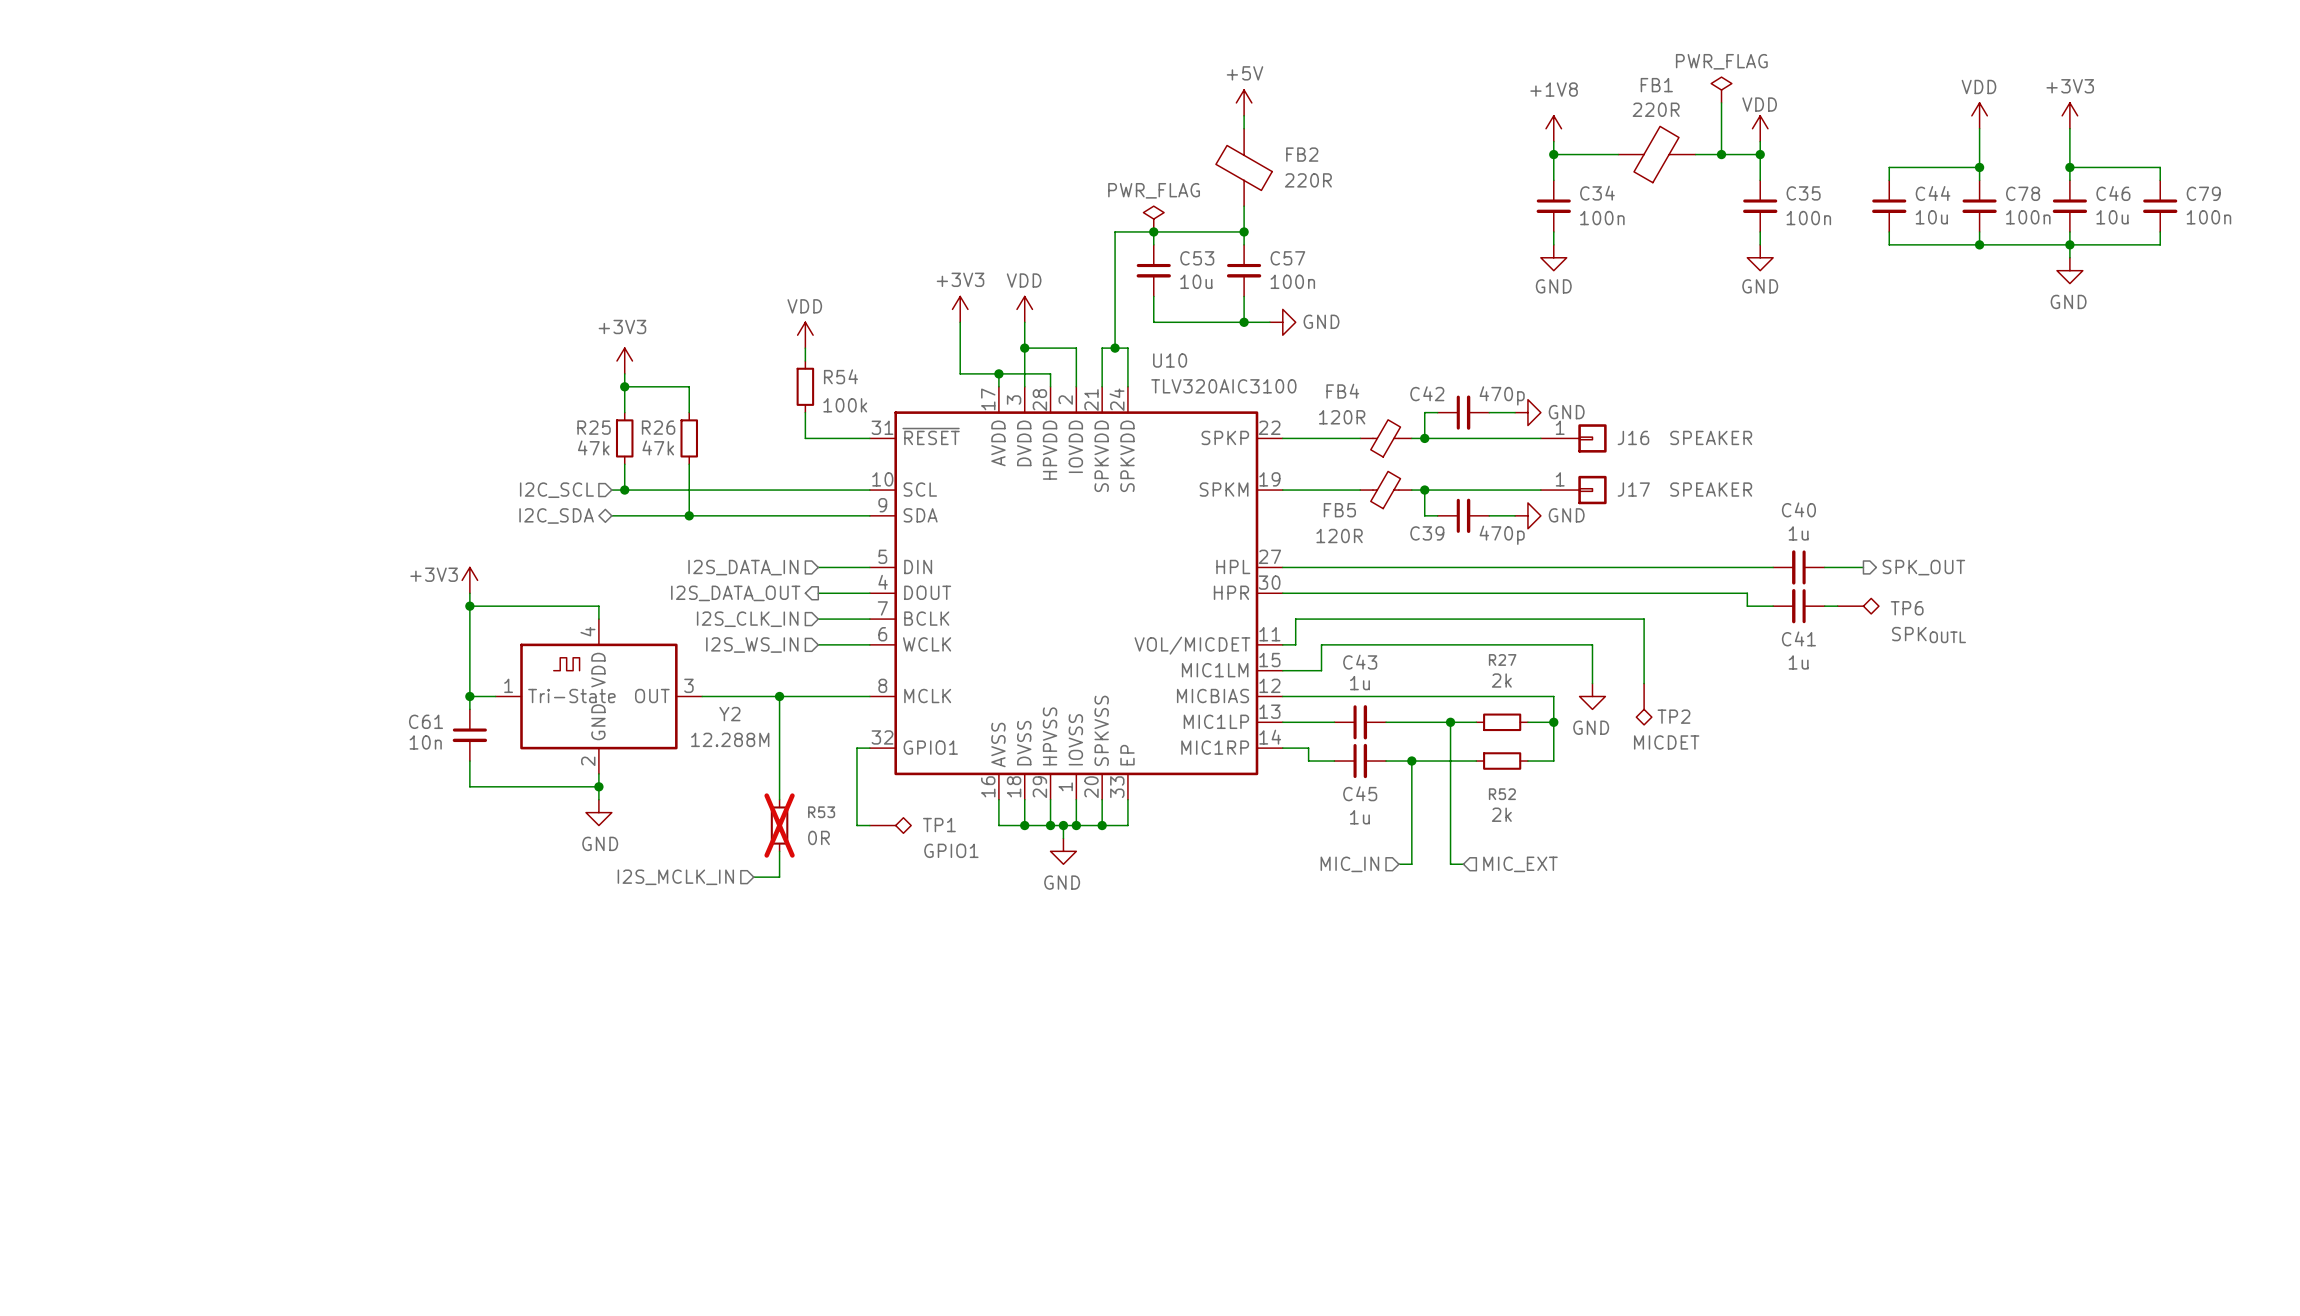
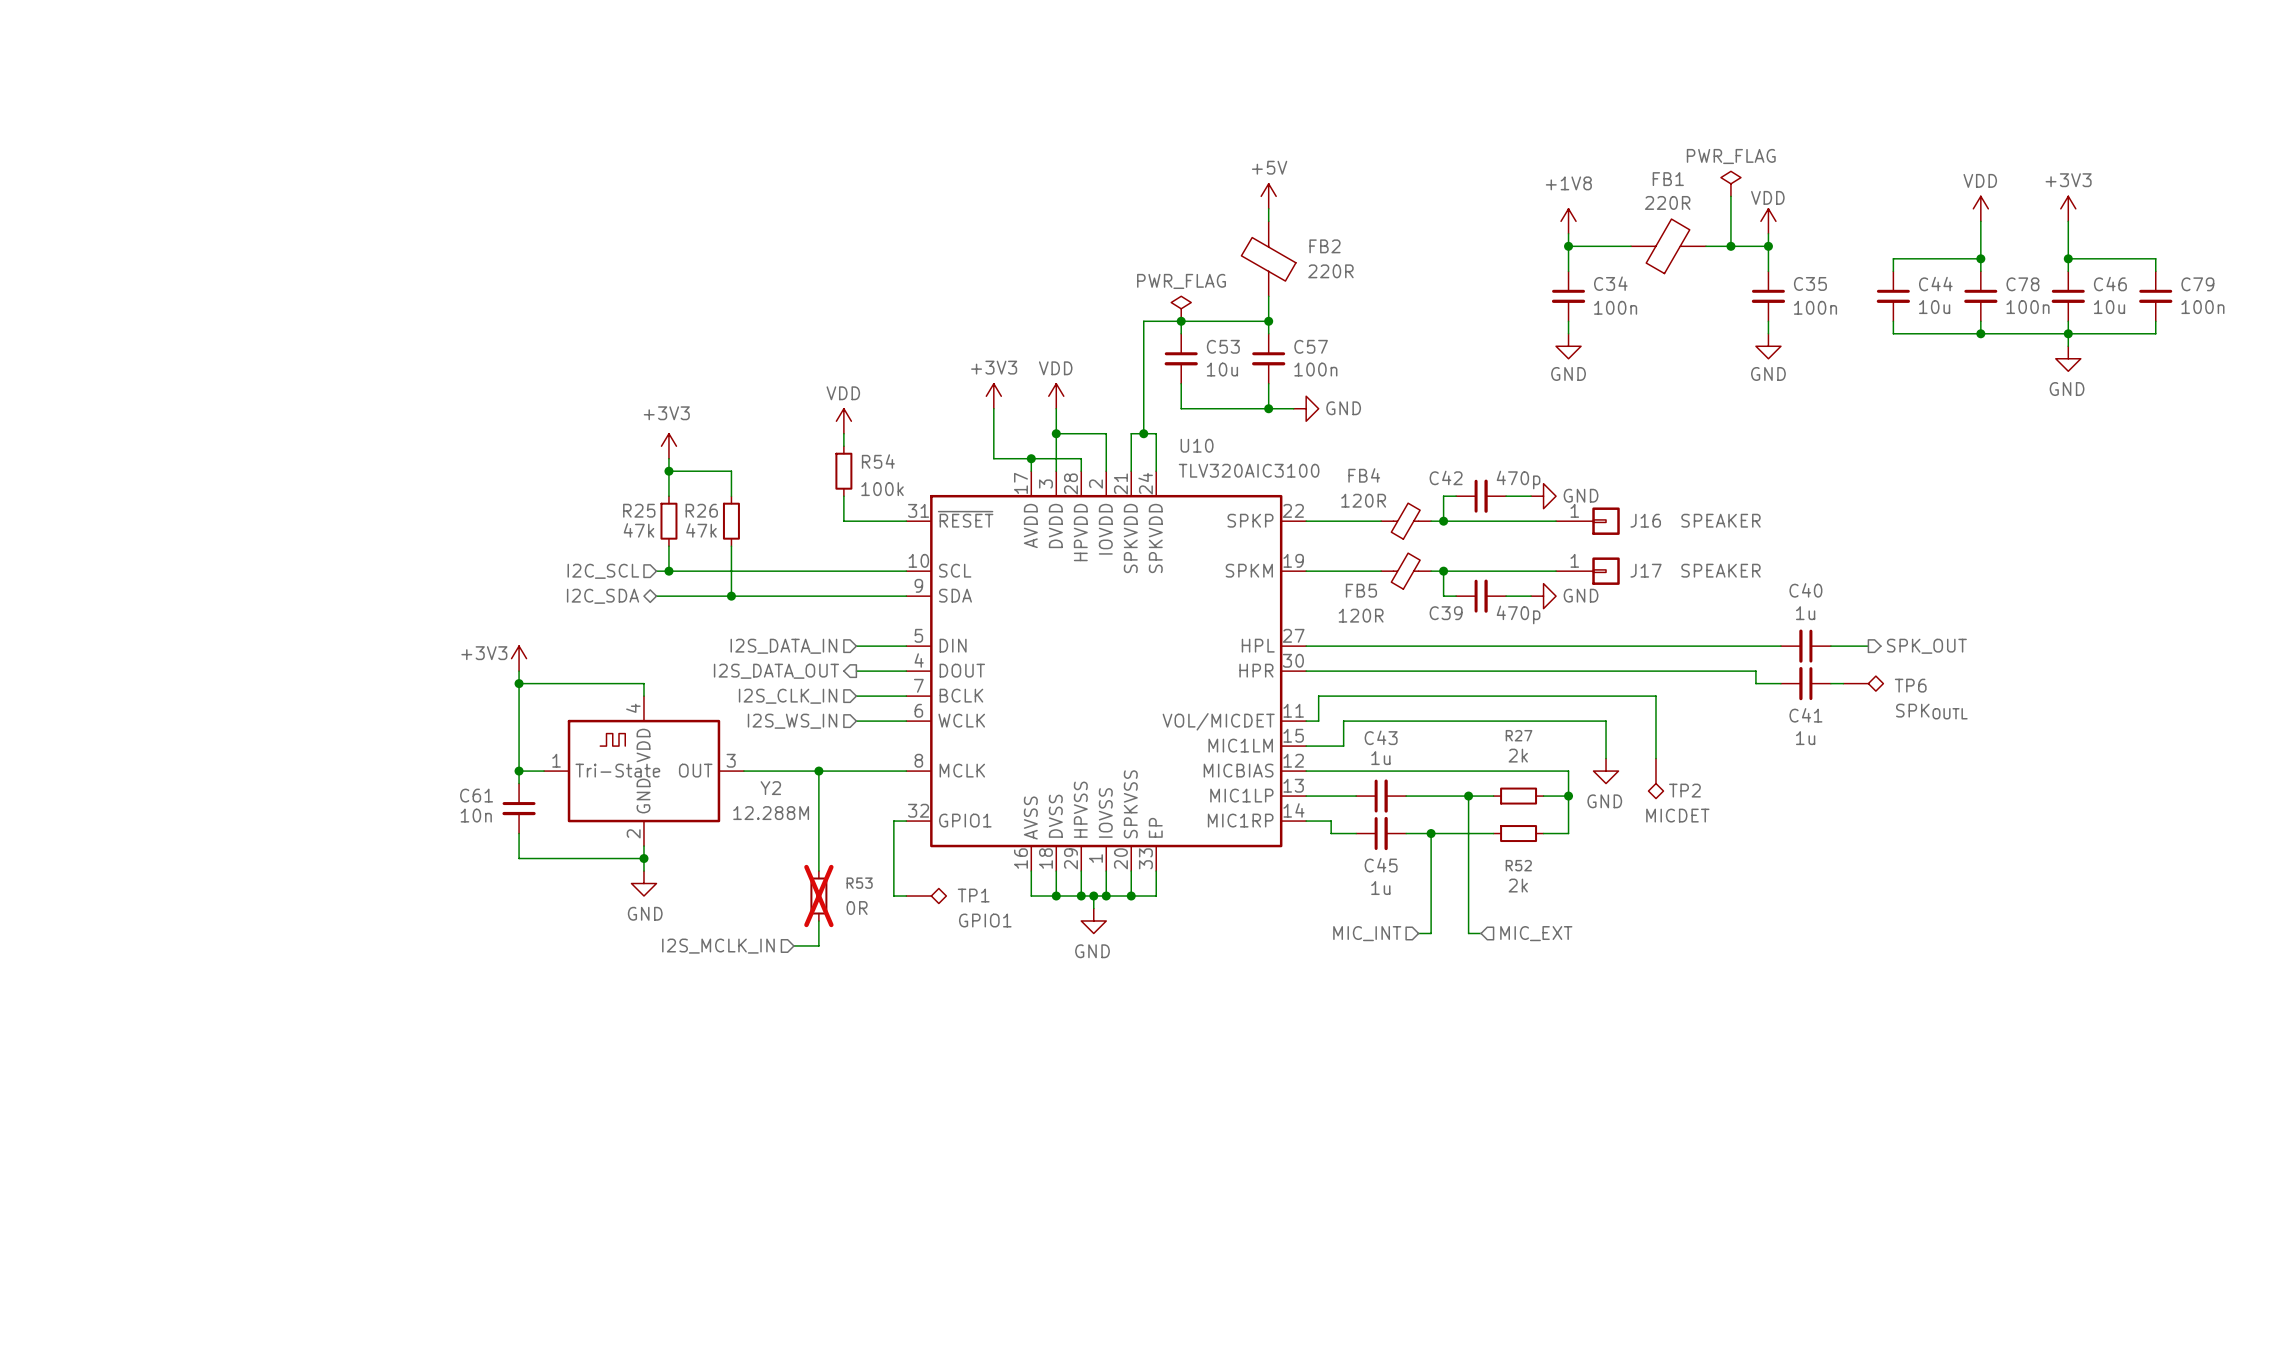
hierarchical label: MIC_IN (1349, 864) -> MIC_INT (1367, 933)

